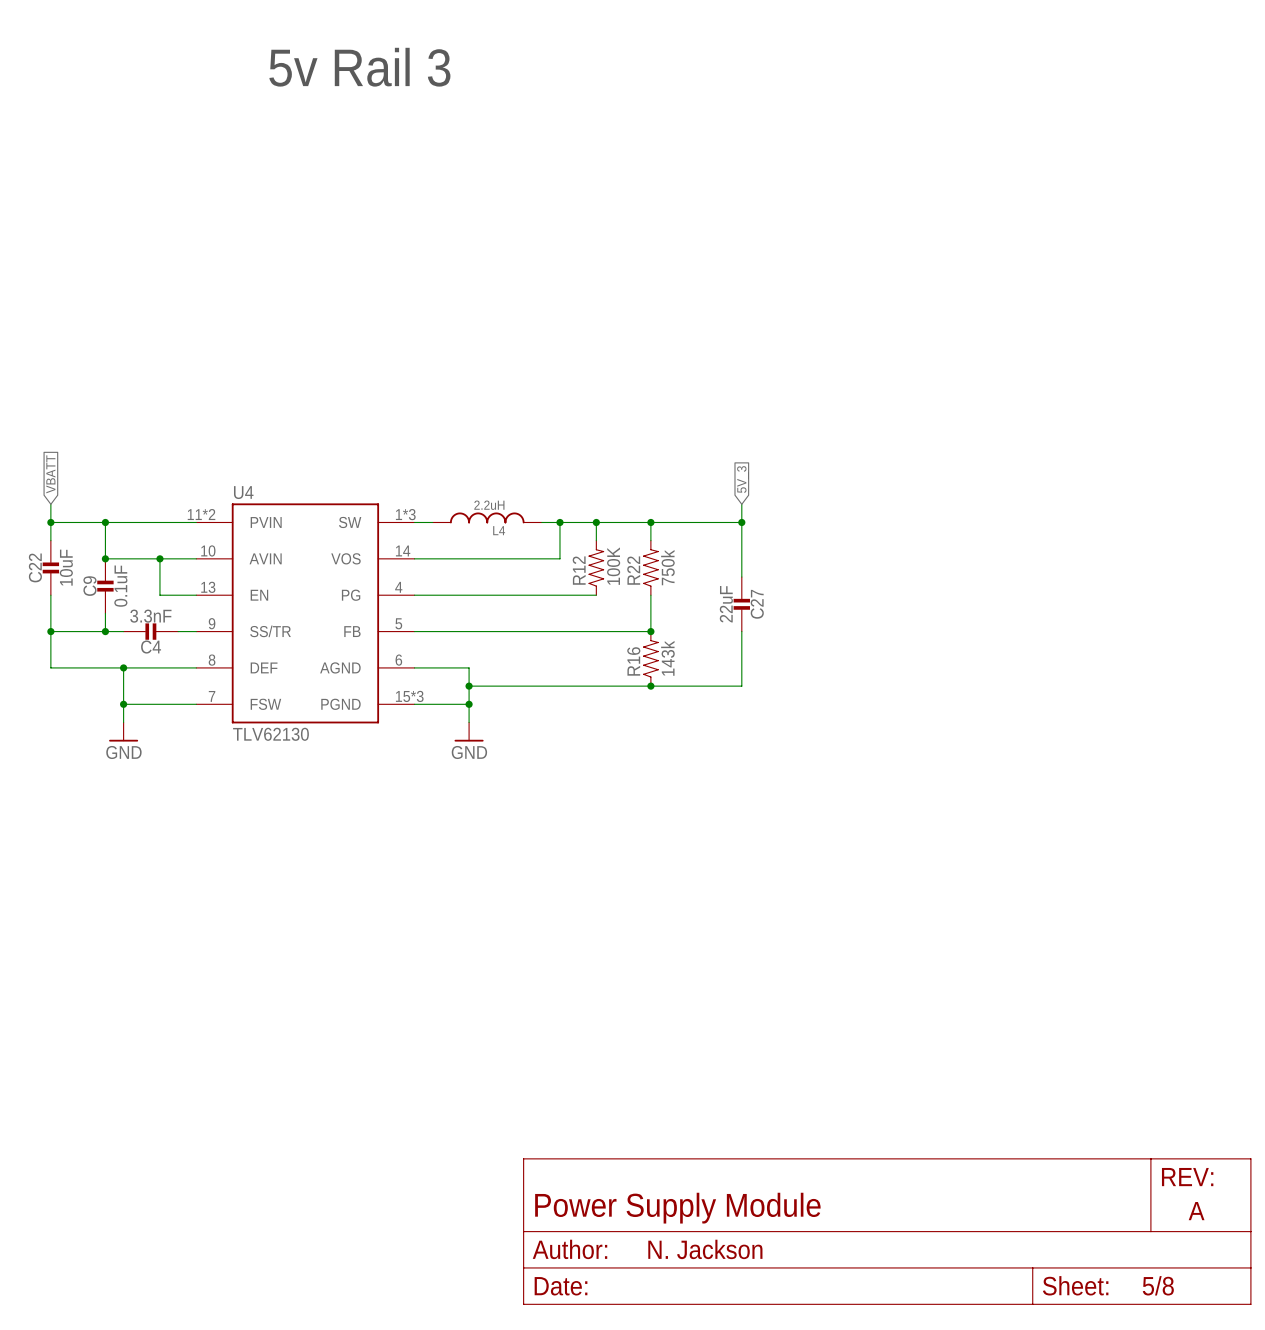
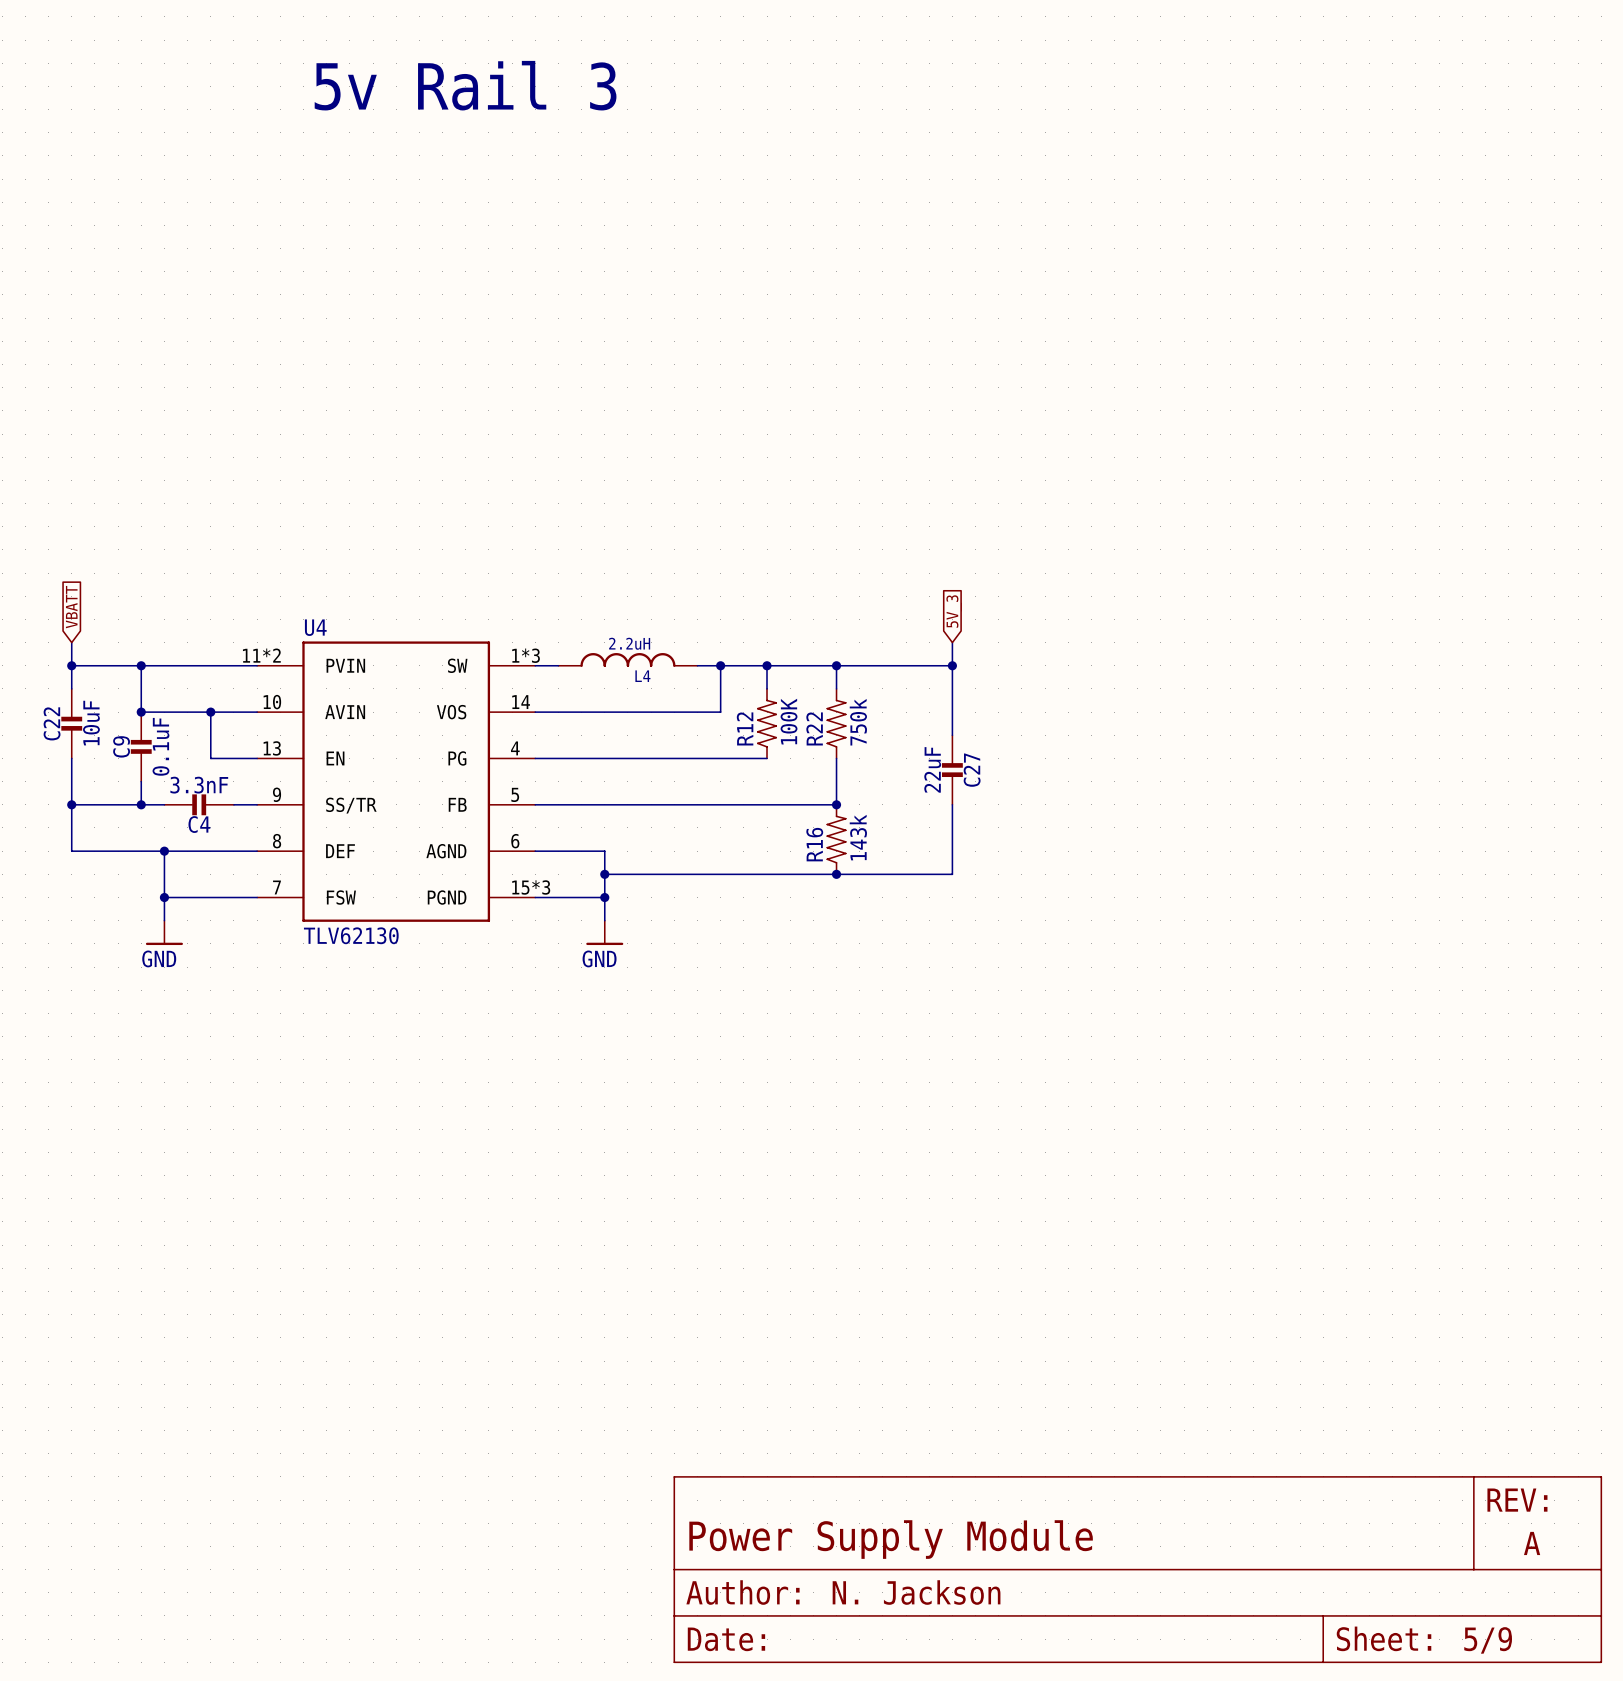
part text: 5/8 (1158, 1285) -> 5/9 (1488, 1640)

